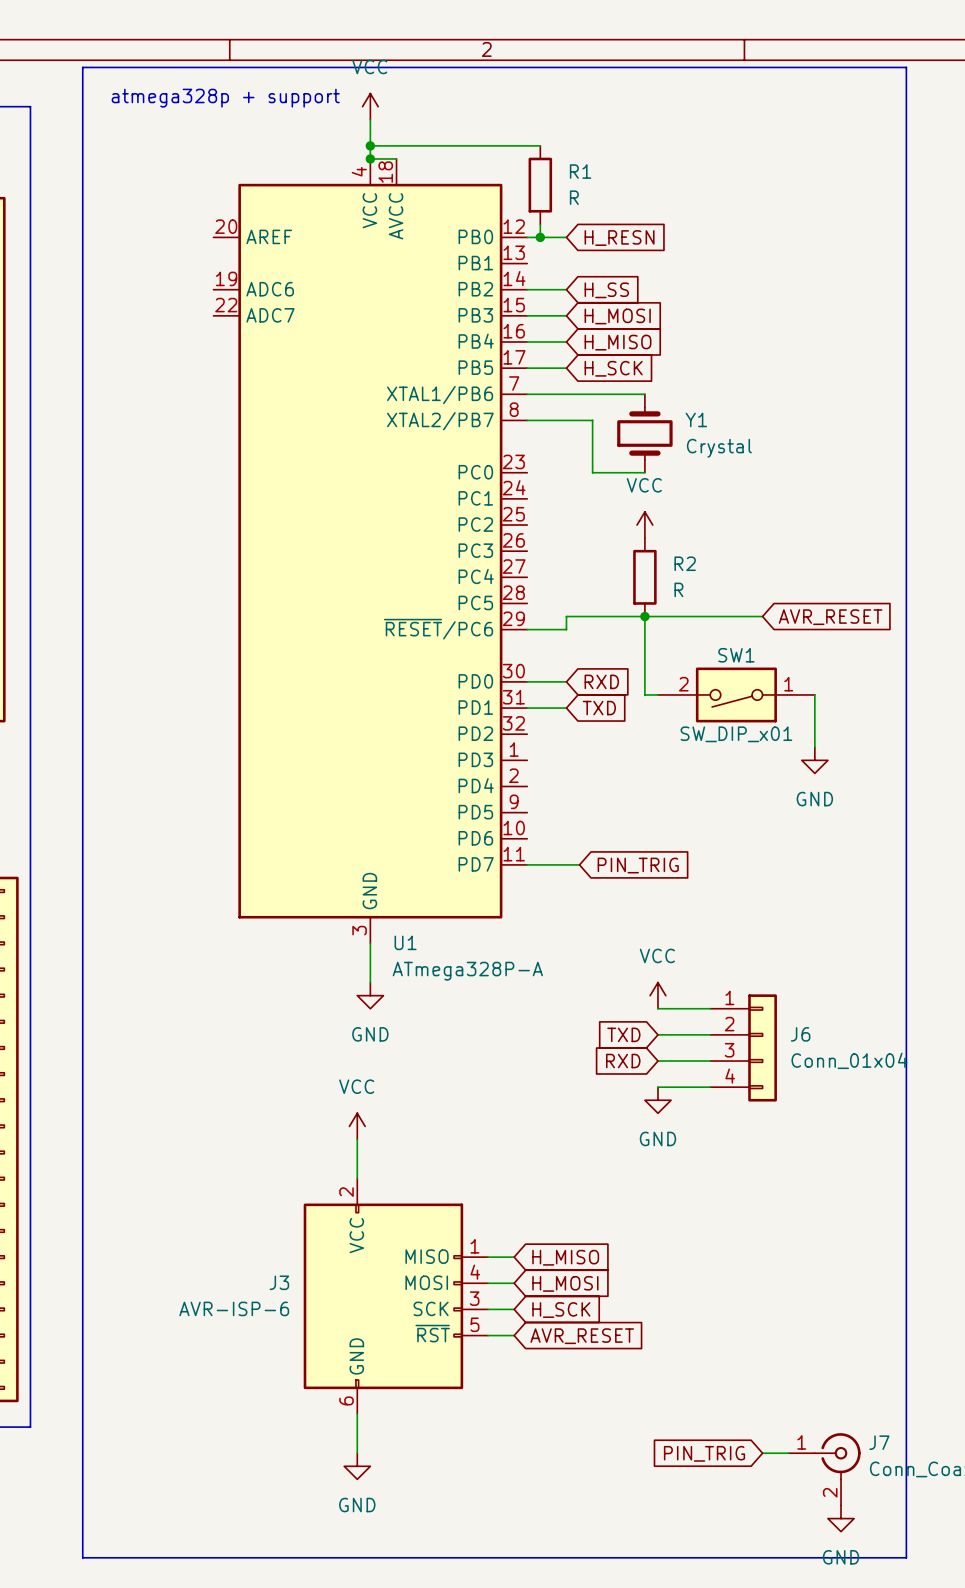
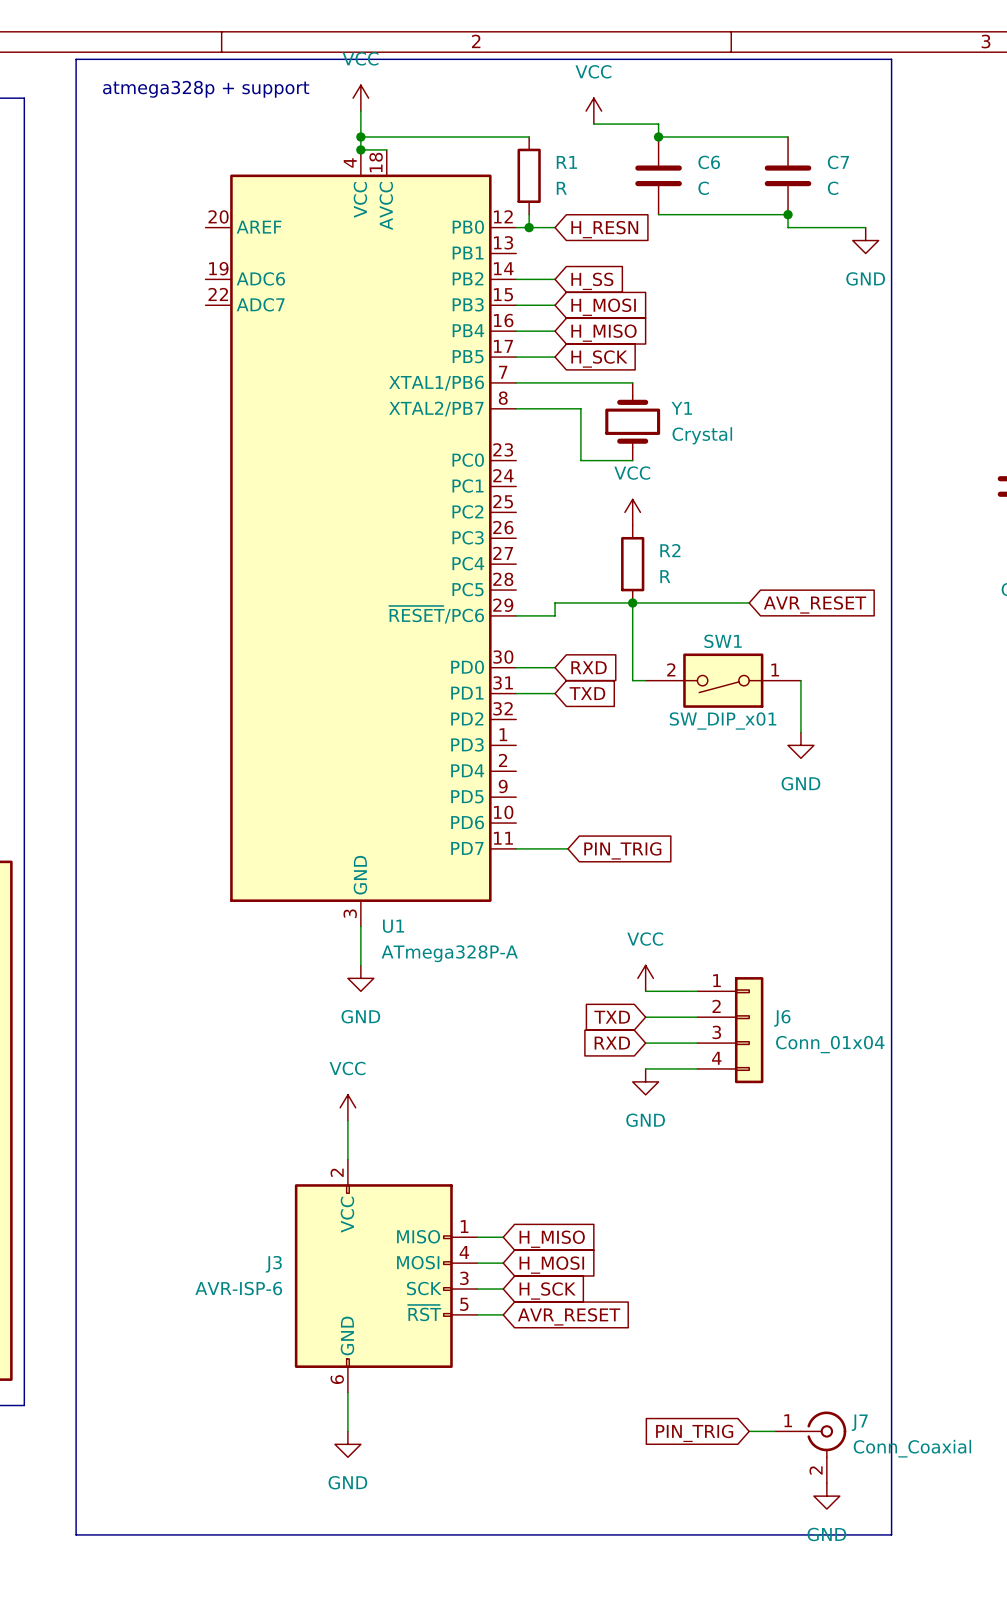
power symbol: none -> VCC (593, 111)
wire: none -> (593, 124) (658, 124) (658, 137) (788, 137)
junction: none -> (658, 137)
C6: none -> C (658, 175)
C7: none -> C (788, 175)
wire: none -> (658, 214) (788, 214) (788, 227) (865, 227)
junction: none -> (788, 214)
power symbol: none -> GND (865, 240)

